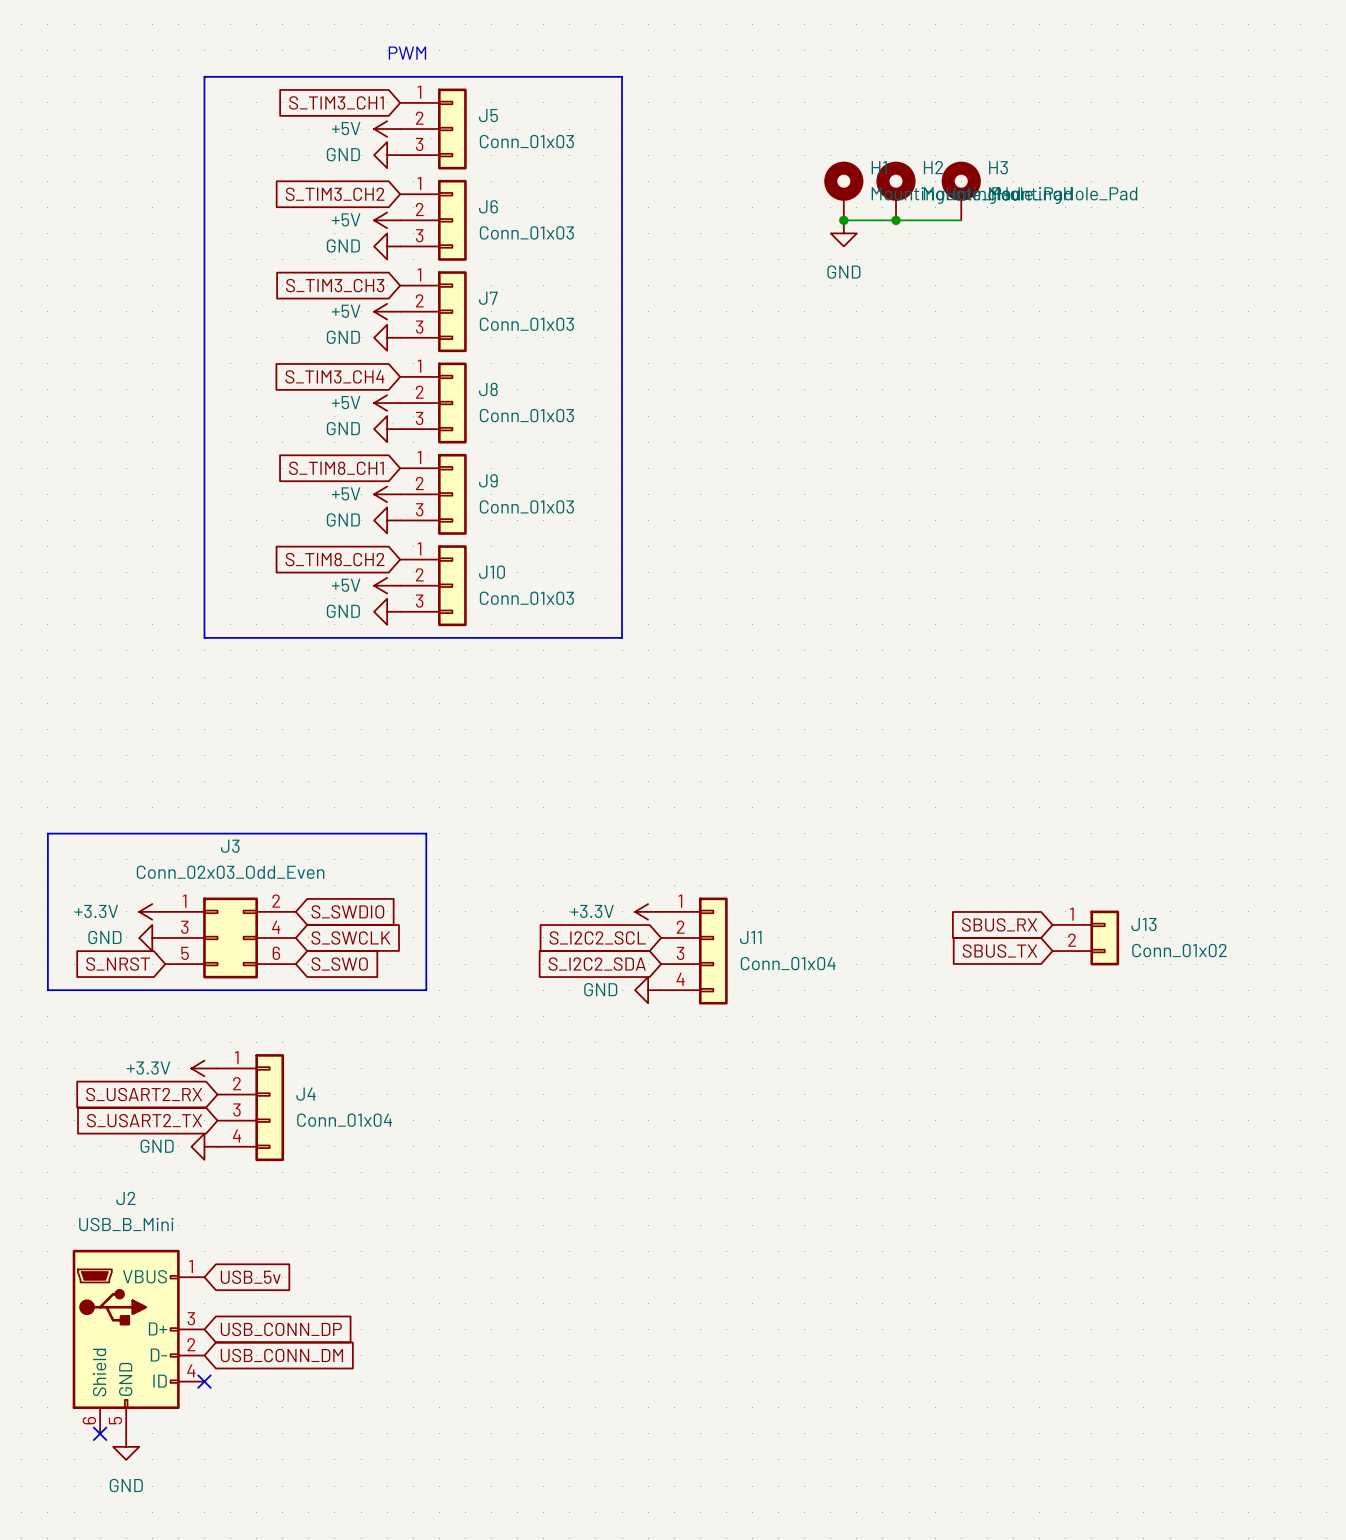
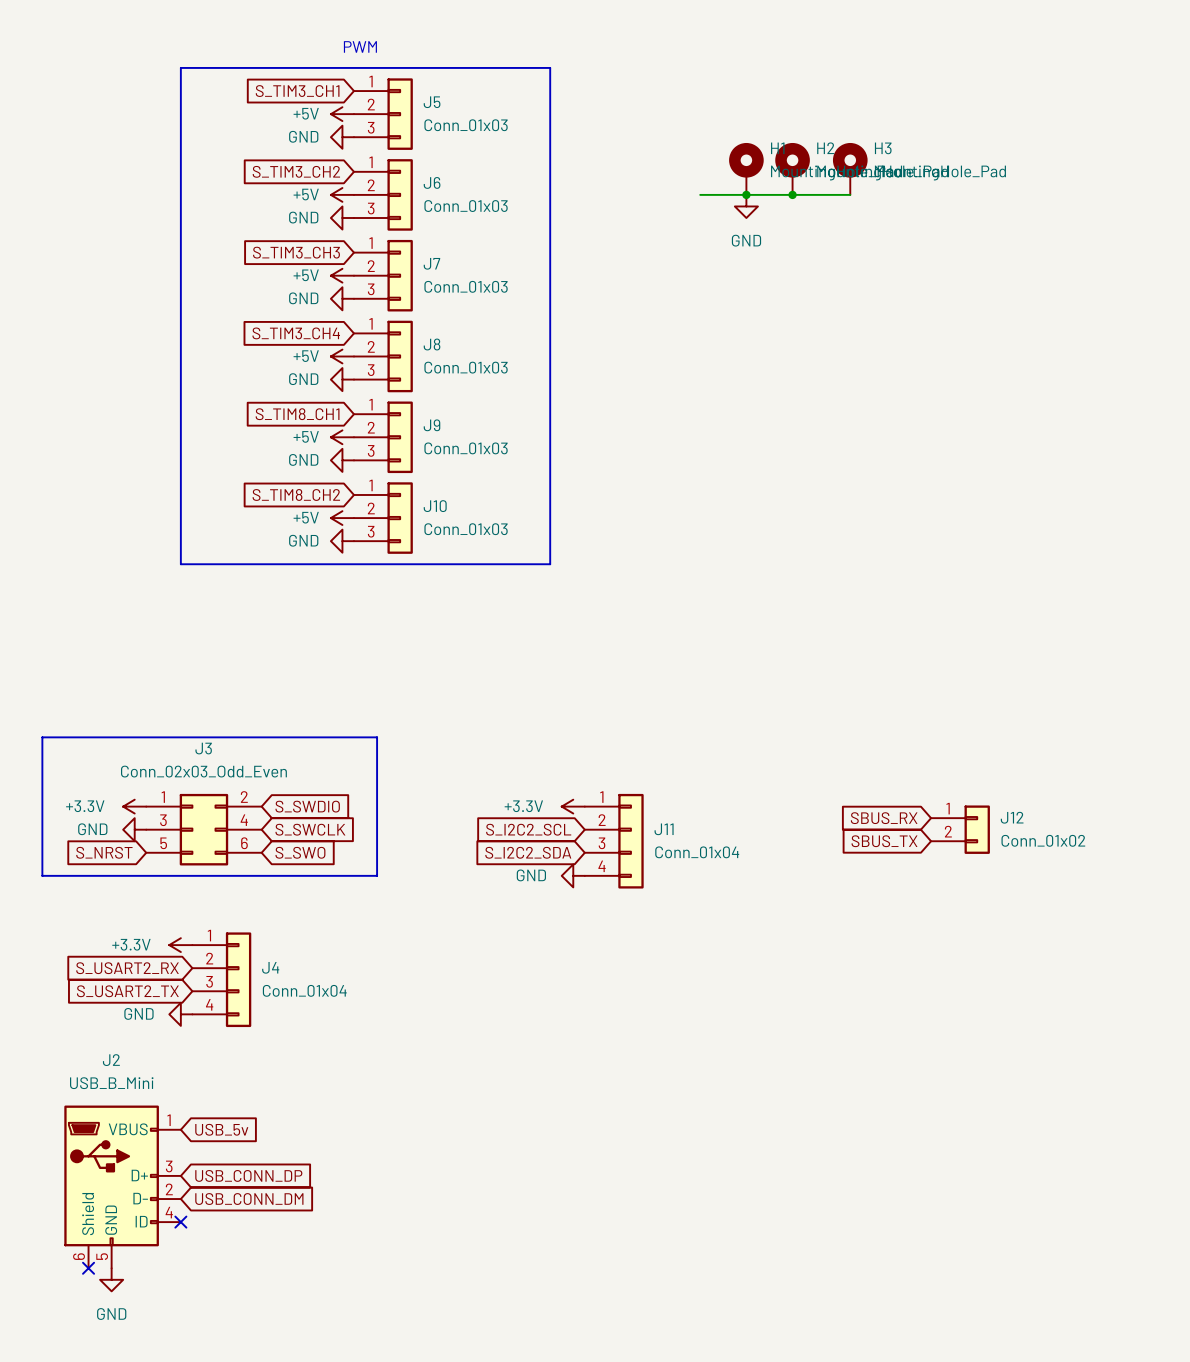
wire: none -> (700, 194) (746, 194)
J13 name: J13 (1143, 924) -> J12 (1012, 817)

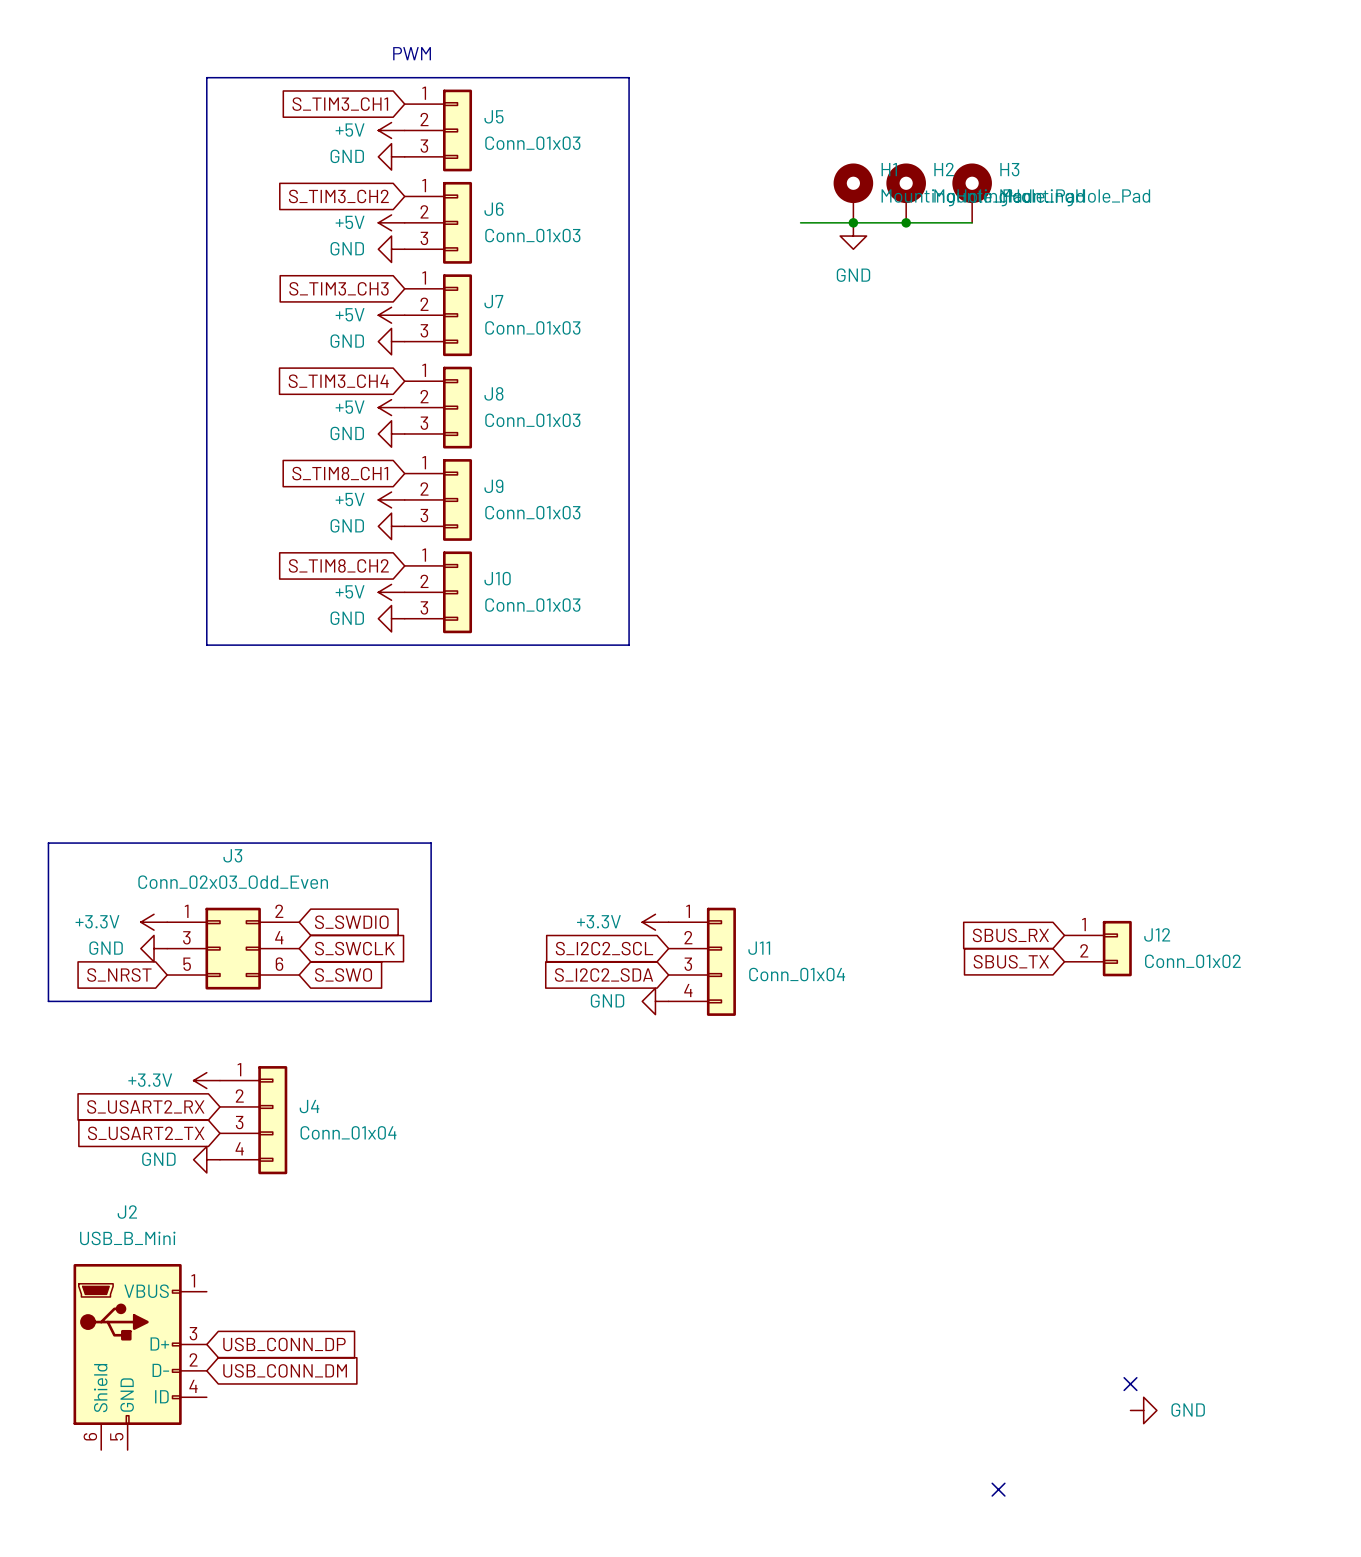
global label: USB_5v (221, 1129) -> none
no-connect mark: none -> (1130, 1384)
no-connect mark: (180, 1222) -> none
power symbol: none -> GND (1143, 1410)
no-connect mark: (88, 1268) -> none
power symbol: GND (111, 1279) -> none
no-connect mark: none -> (998, 1489)

